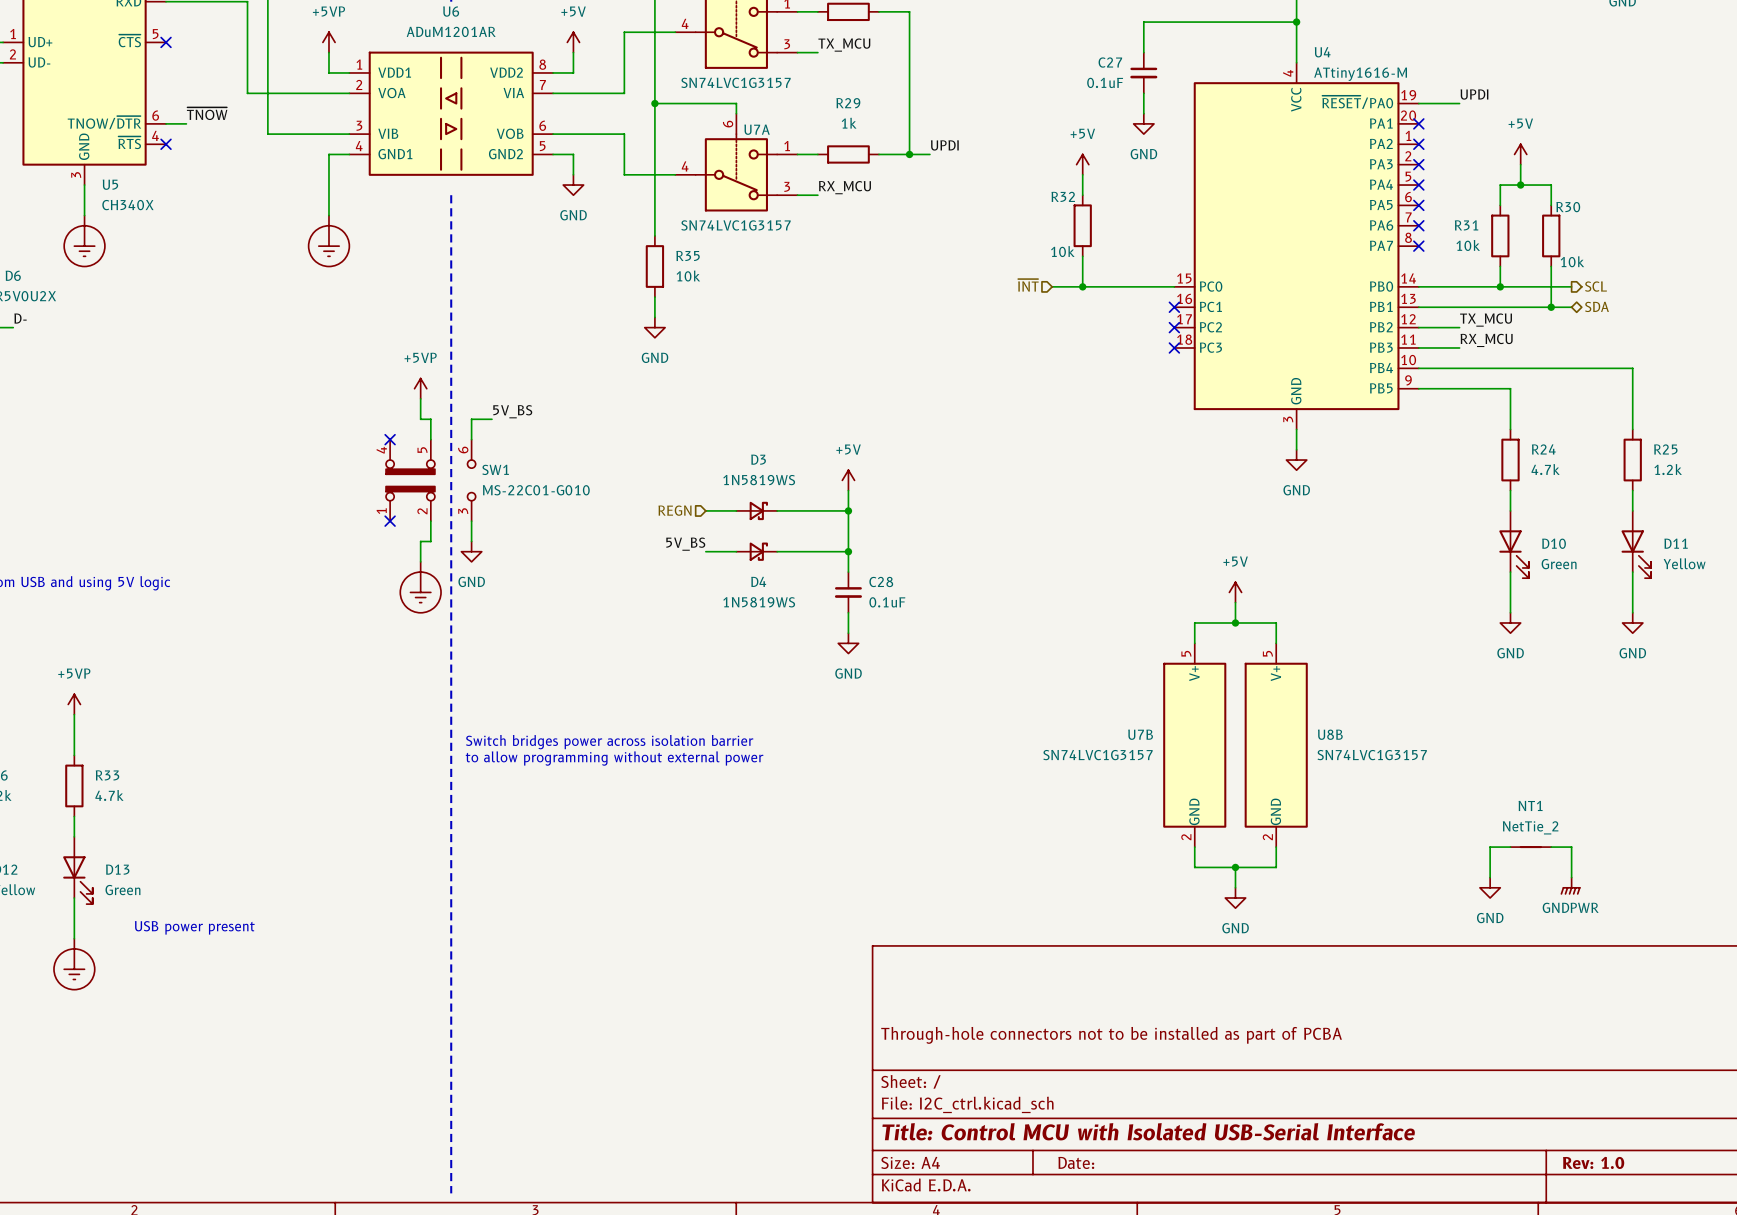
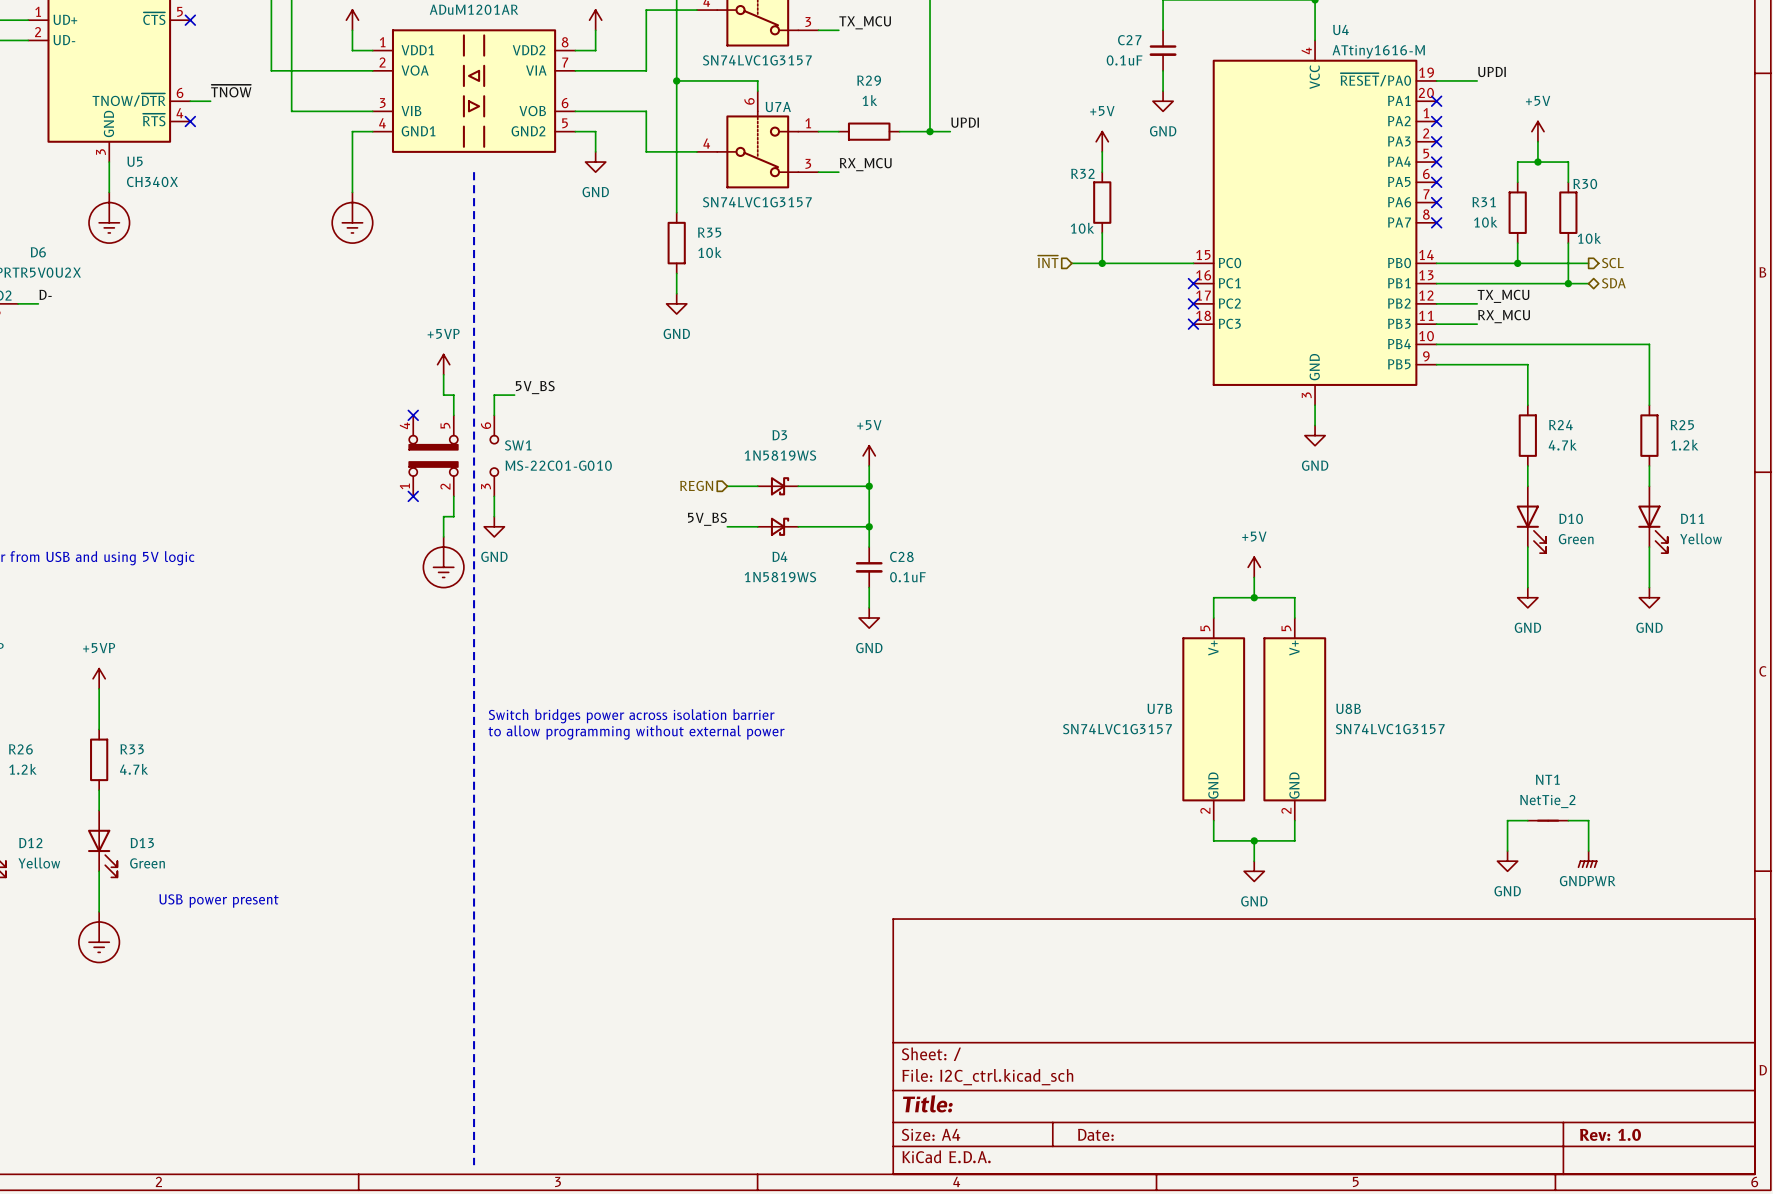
title block: Through-hole connectors not to be installed as part of PCBA (1111, 1035) -> none
title block: Title: Control MCU with Isolated USB-Serial Interface (1148, 1131) -> Title: (927, 1103)

